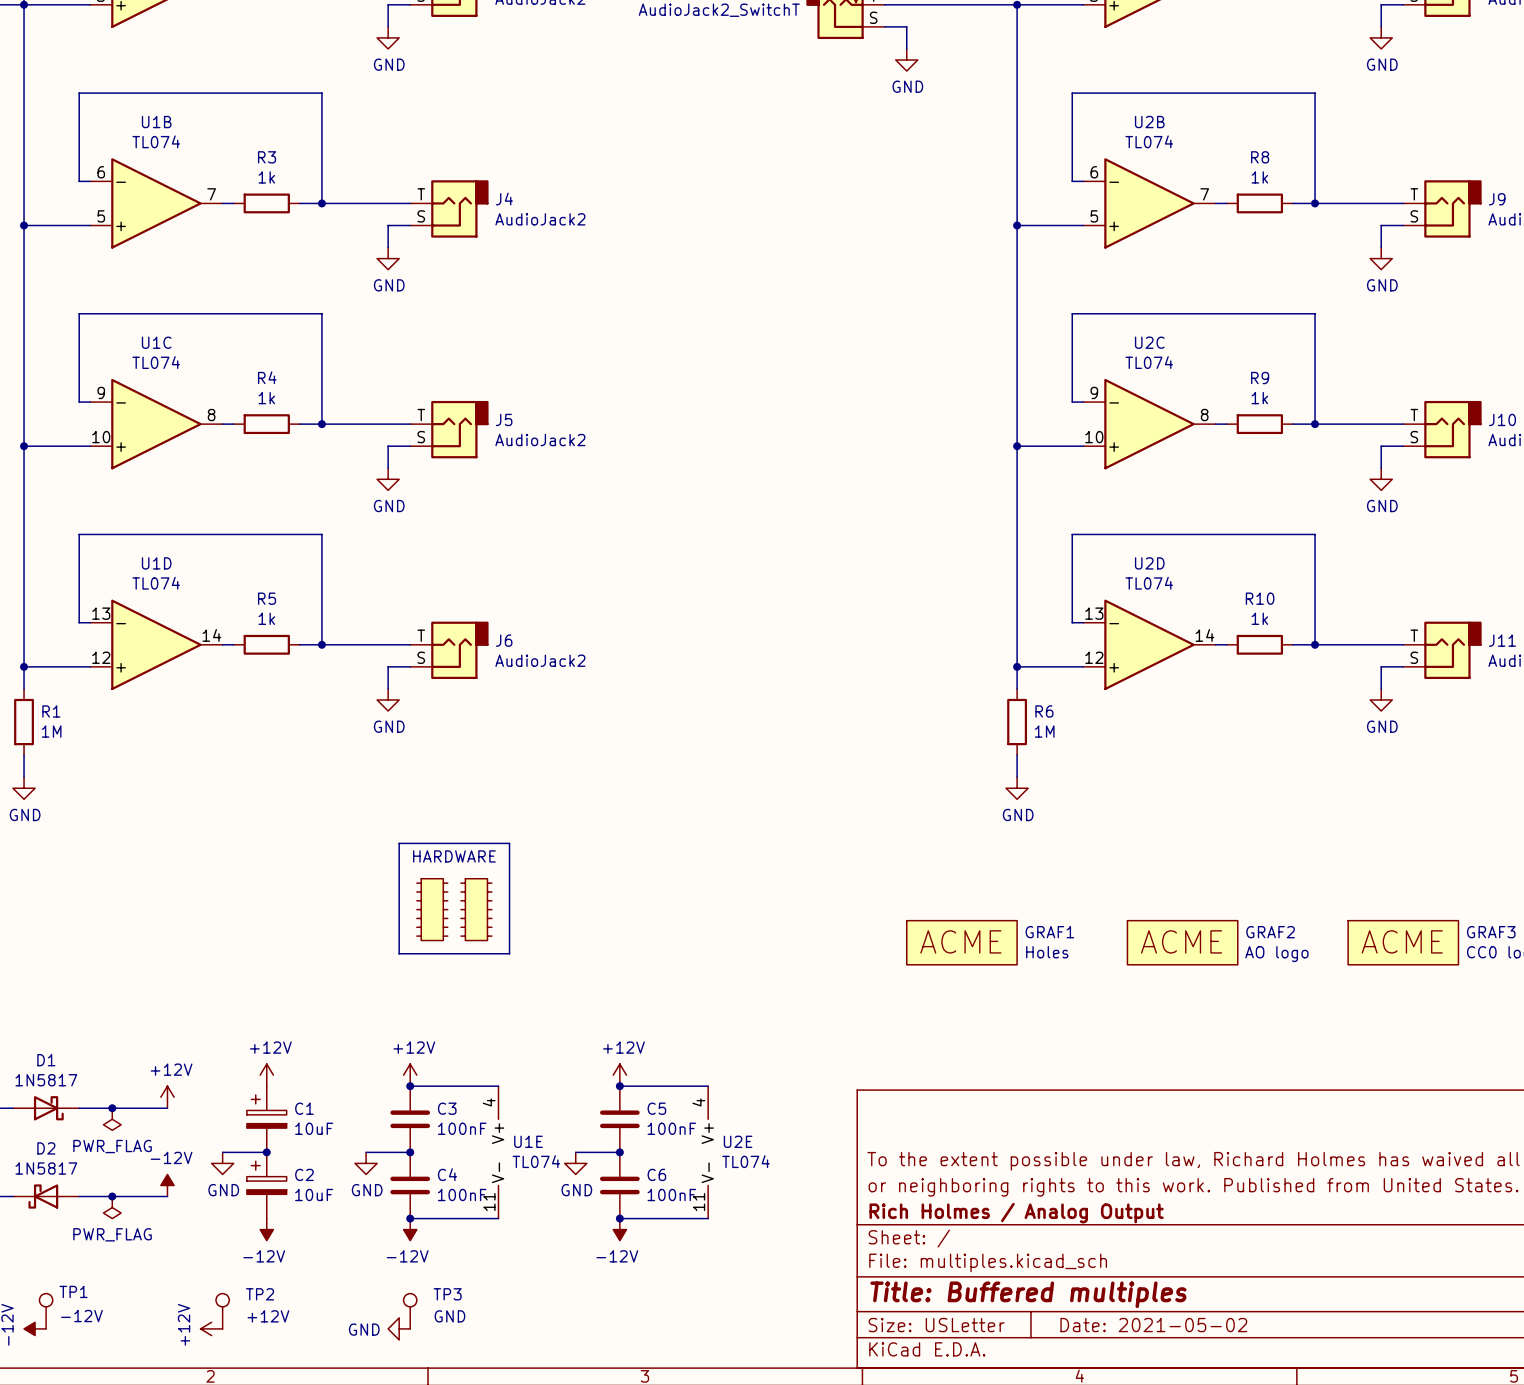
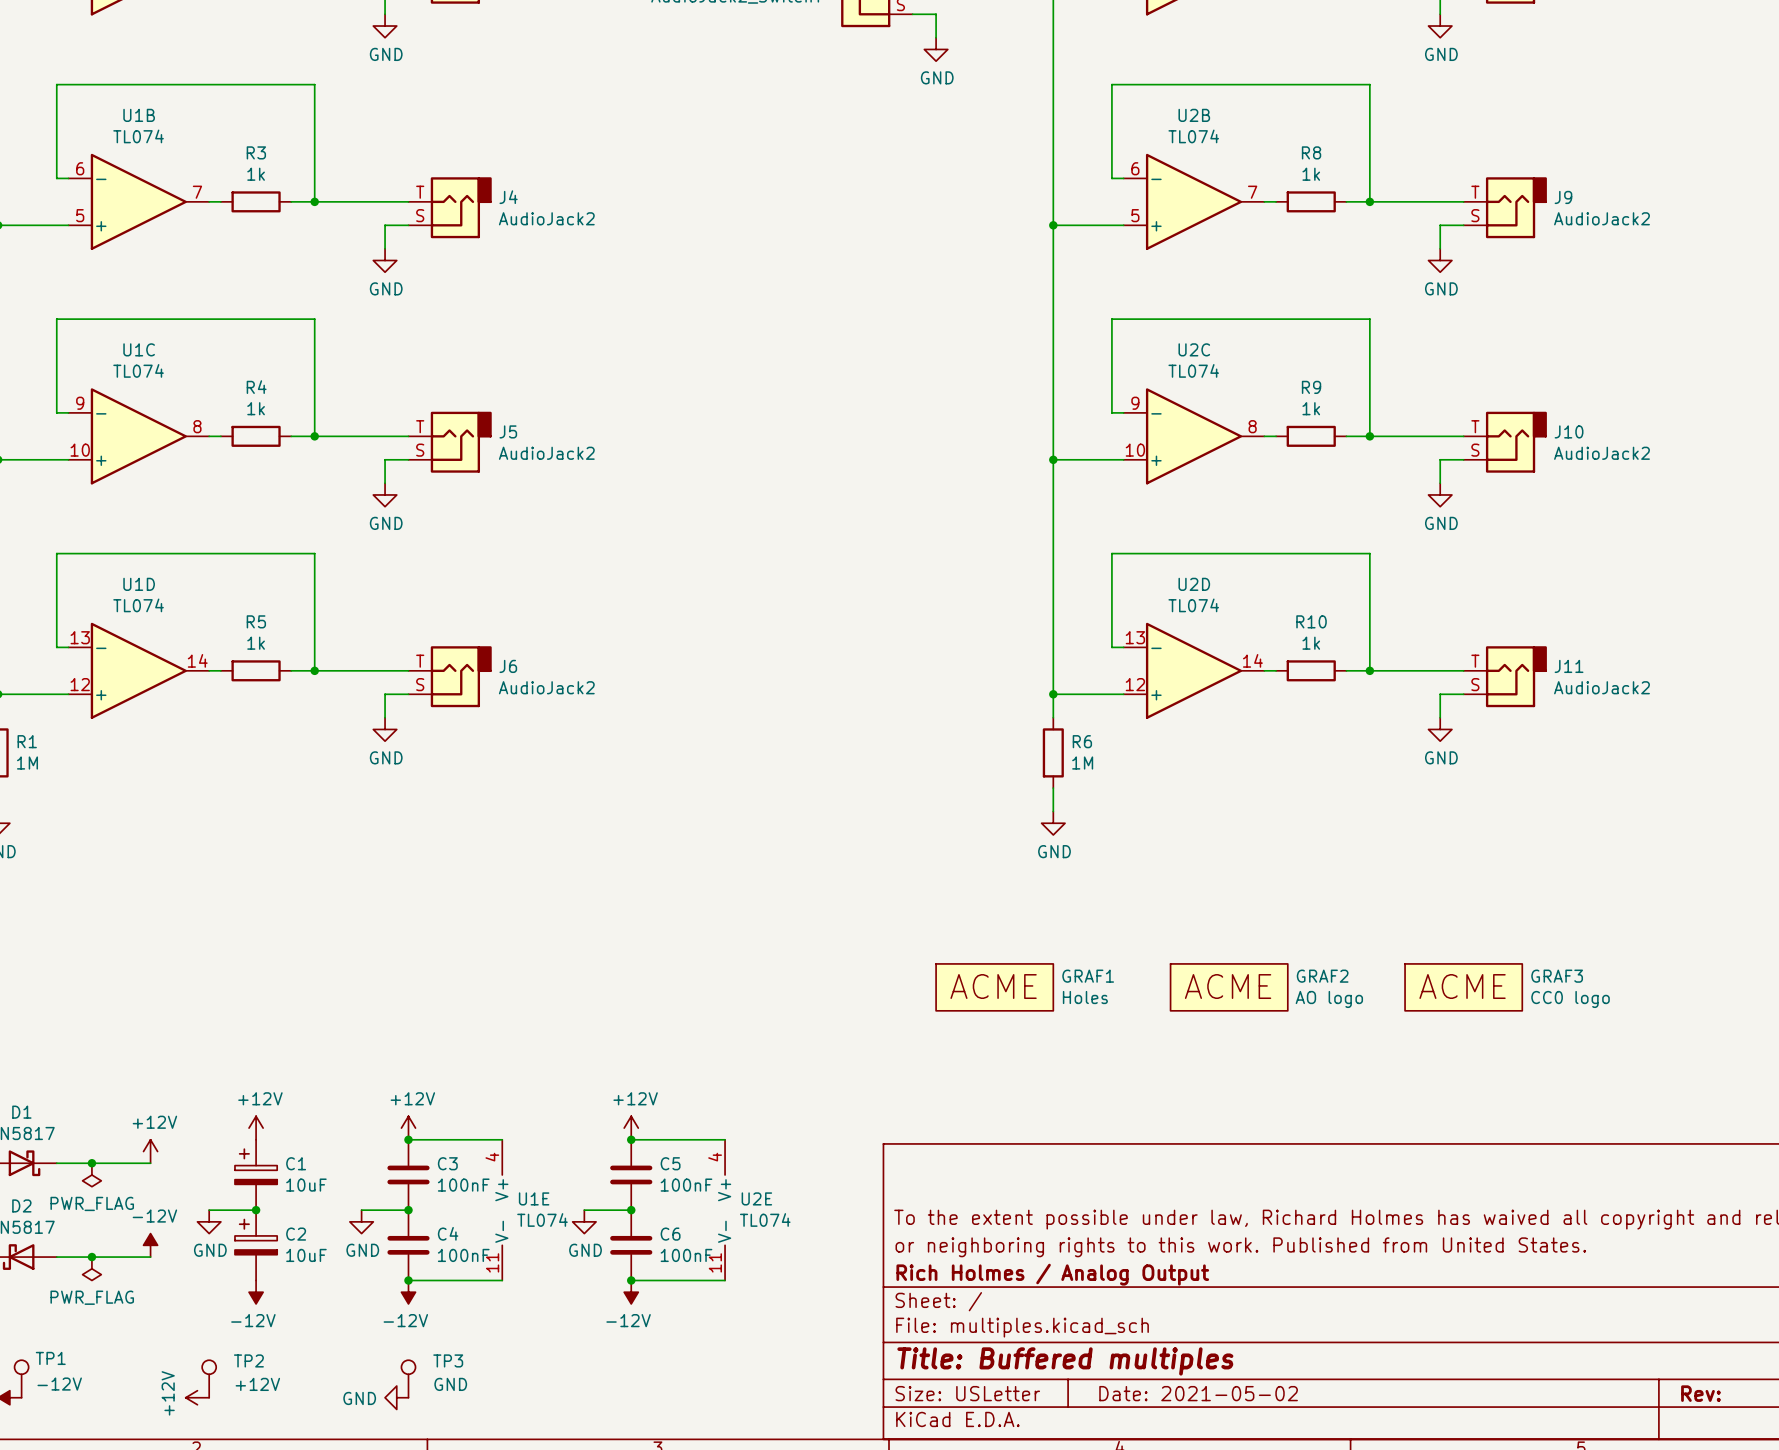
line: (399, 843) (509, 843) (509, 953) (399, 953) (399, 843) -> none
text: HARDWARE (454, 856) -> none
part: (432, 909) -> none
part: (476, 909) -> none

